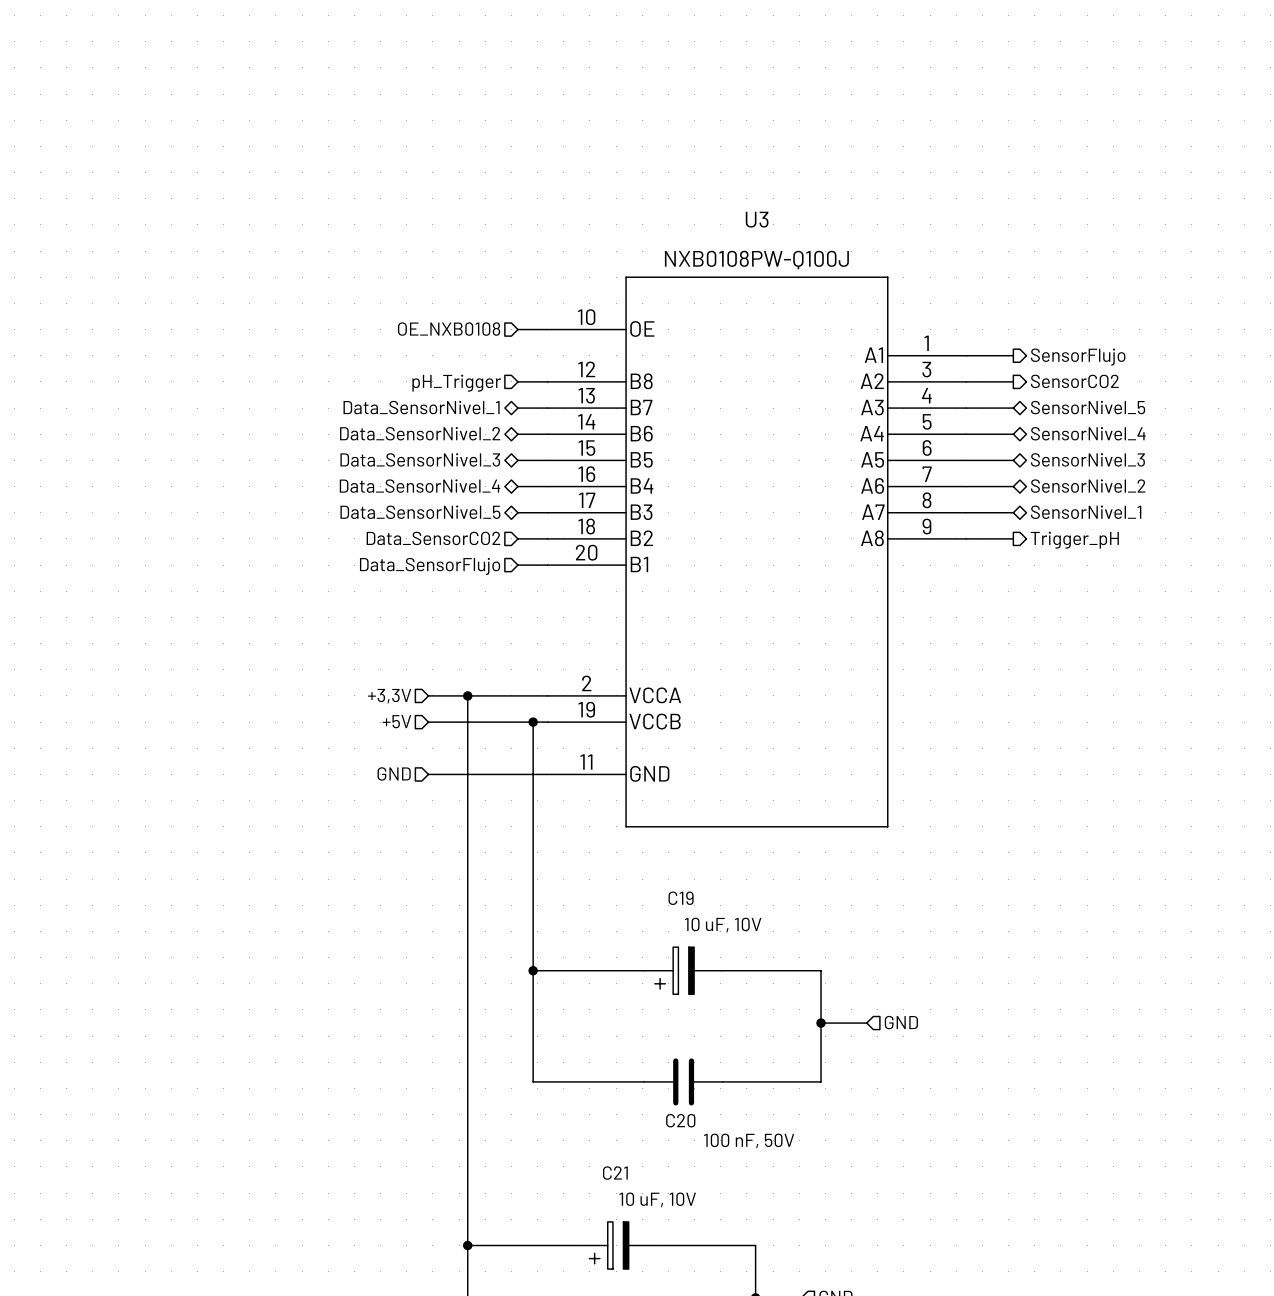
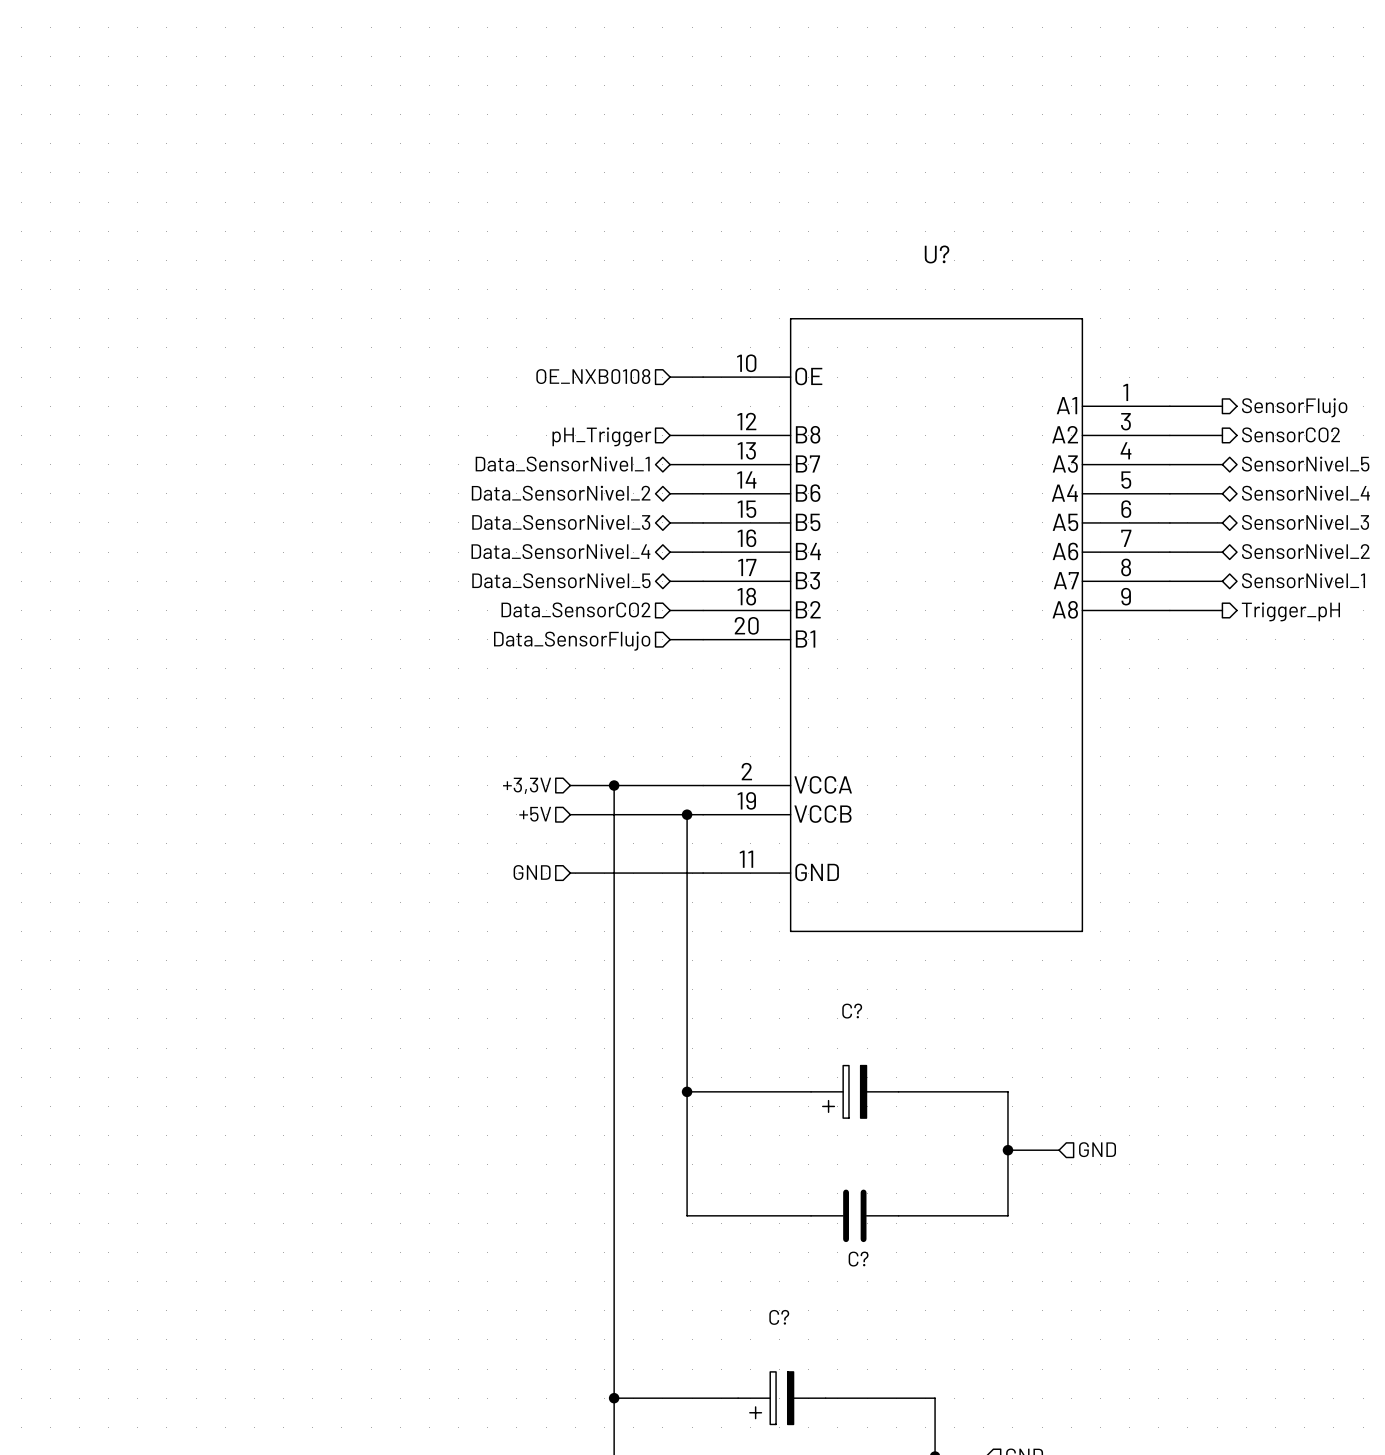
U3 name: U3 (757, 219) -> U? (937, 254)
U3 value: NXB0108PW-Q100J (756, 260) -> none
C19 name: C19 (681, 898) -> C? (852, 1011)
C19 value: 10 uF, 10V (723, 925) -> none
C20 name: C20 (680, 1120) -> C? (858, 1259)
C20 value: 100 nF, 50V (749, 1140) -> none
C21 name: C21 (615, 1173) -> C? (779, 1317)
C21 value: 10 uF, 10V (657, 1199) -> none

